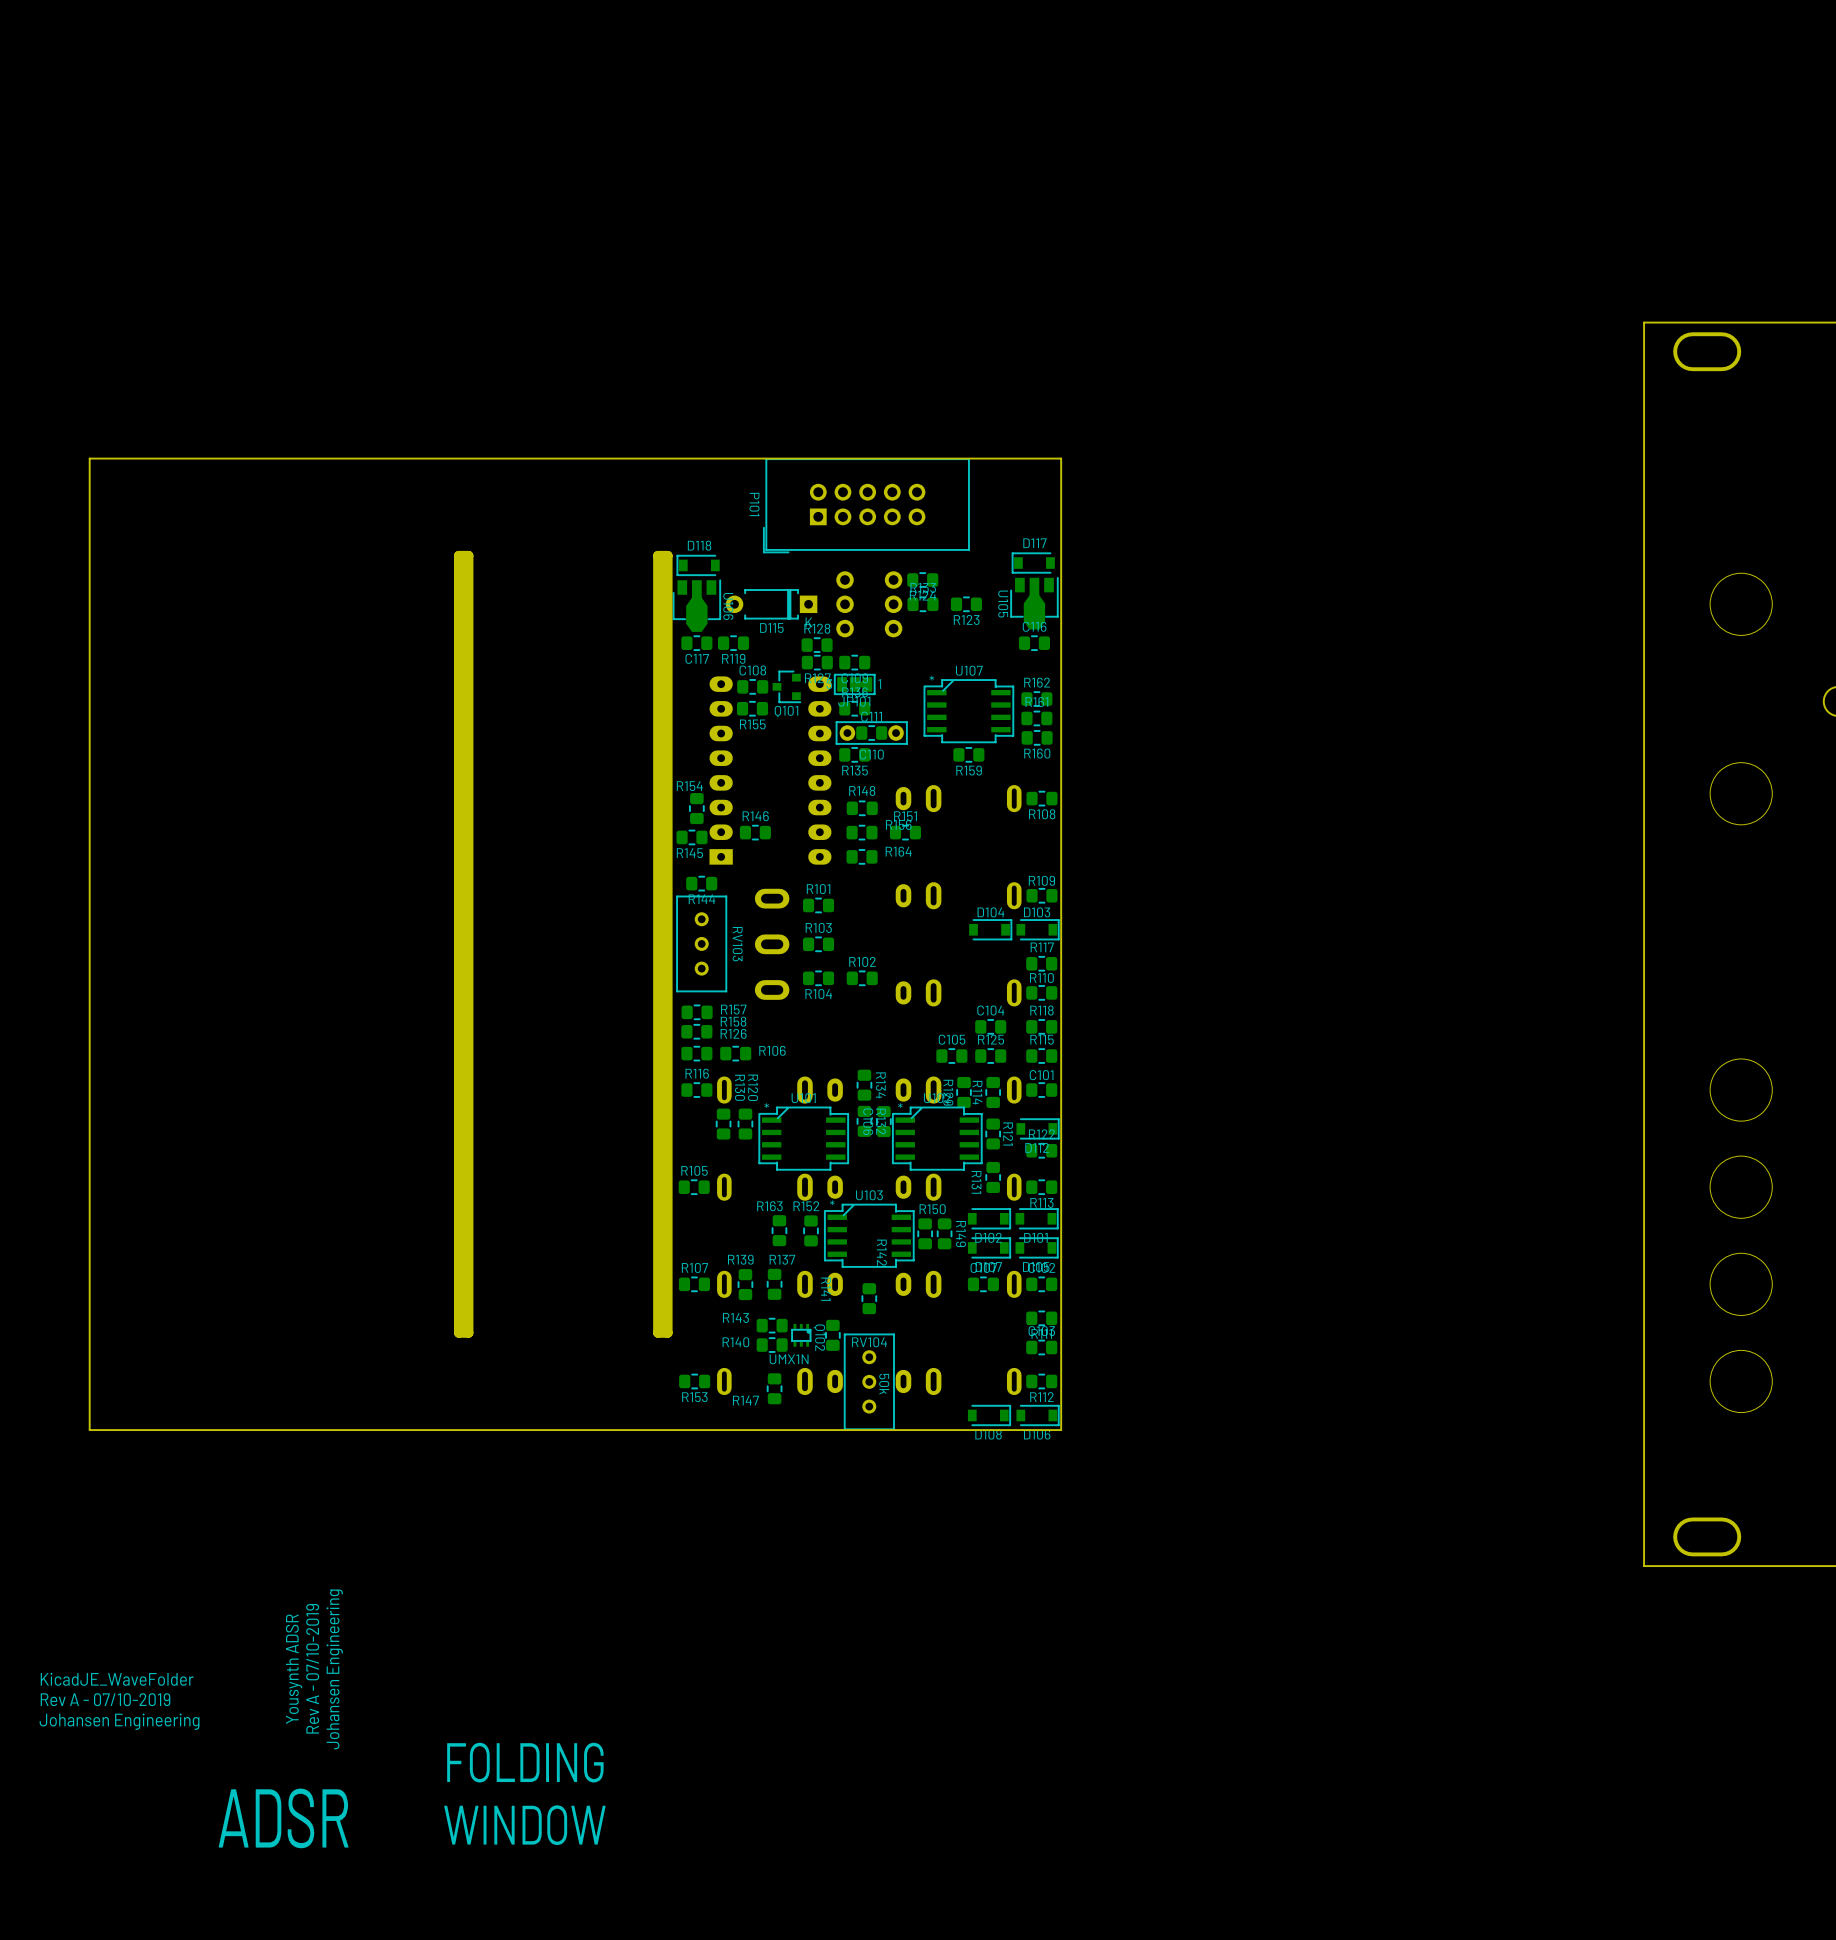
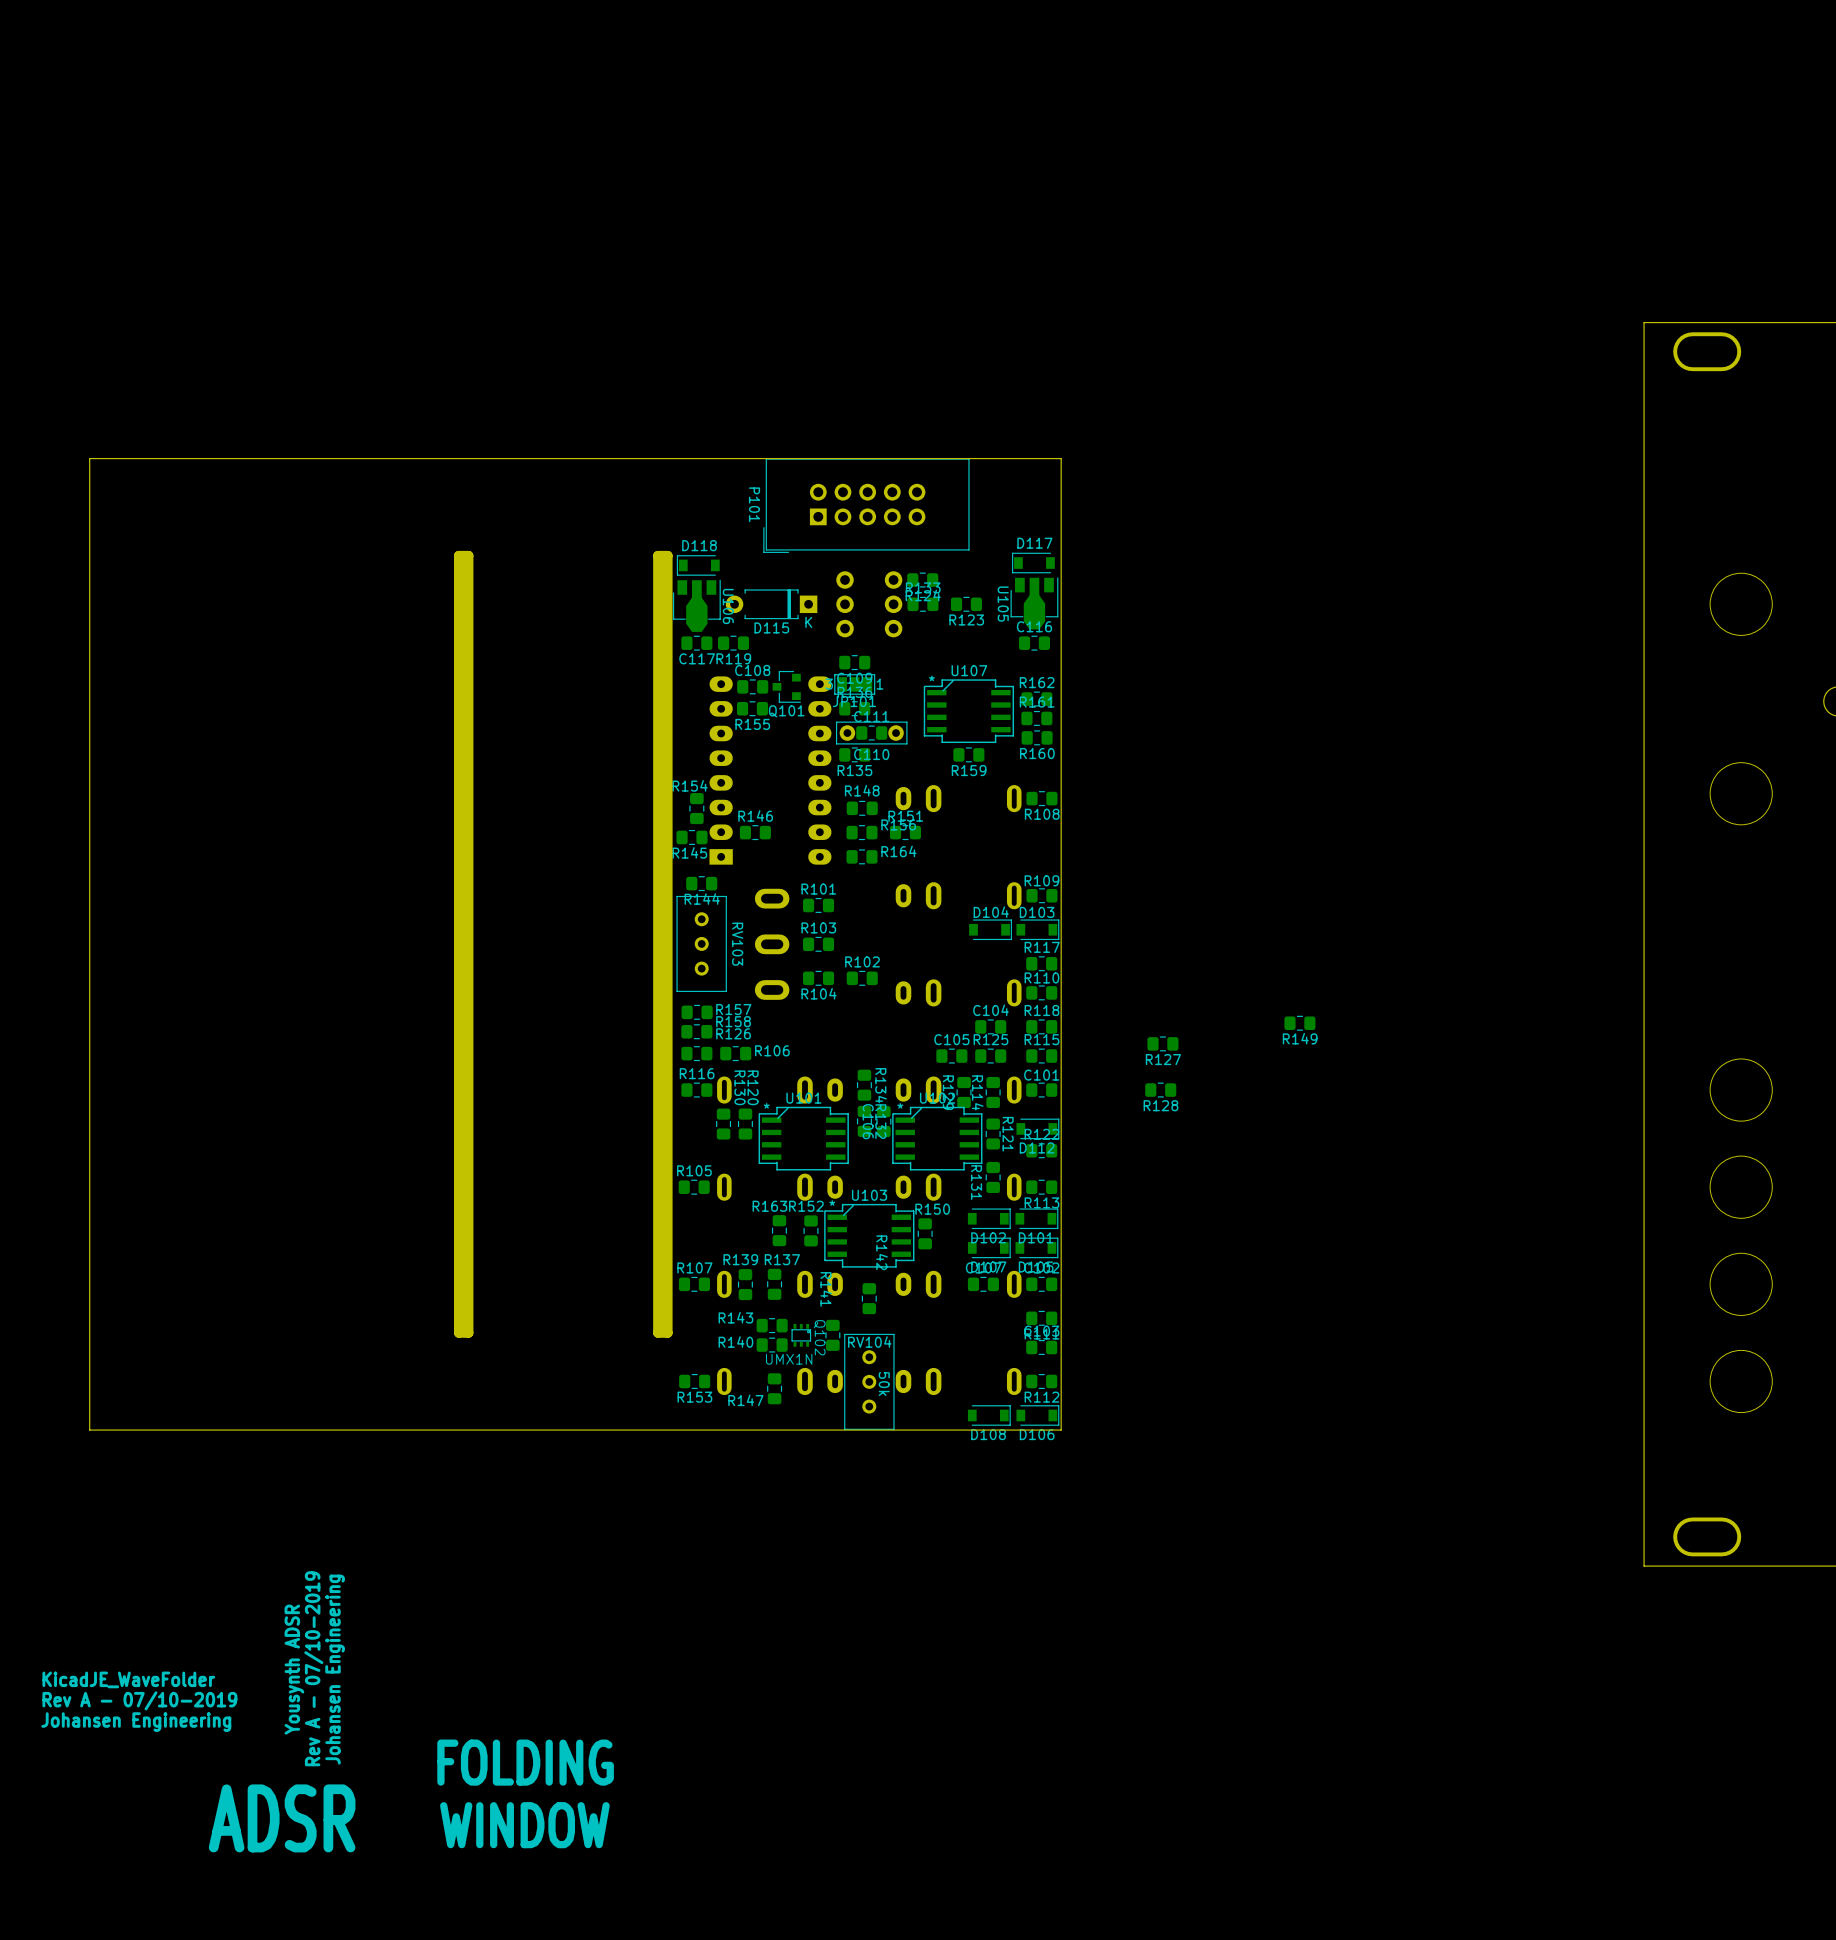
R128 name position: R128 (817, 628) -> R128 (1160, 1105)
R128 position: (817, 645) -> (1160, 1090)
R127 position: (817, 662) -> (1162, 1043)
R149 rotation: 0° (944, 1233) -> 90° clockwise (1299, 1023)
R149 position: (944, 1233) -> (1299, 1023)

